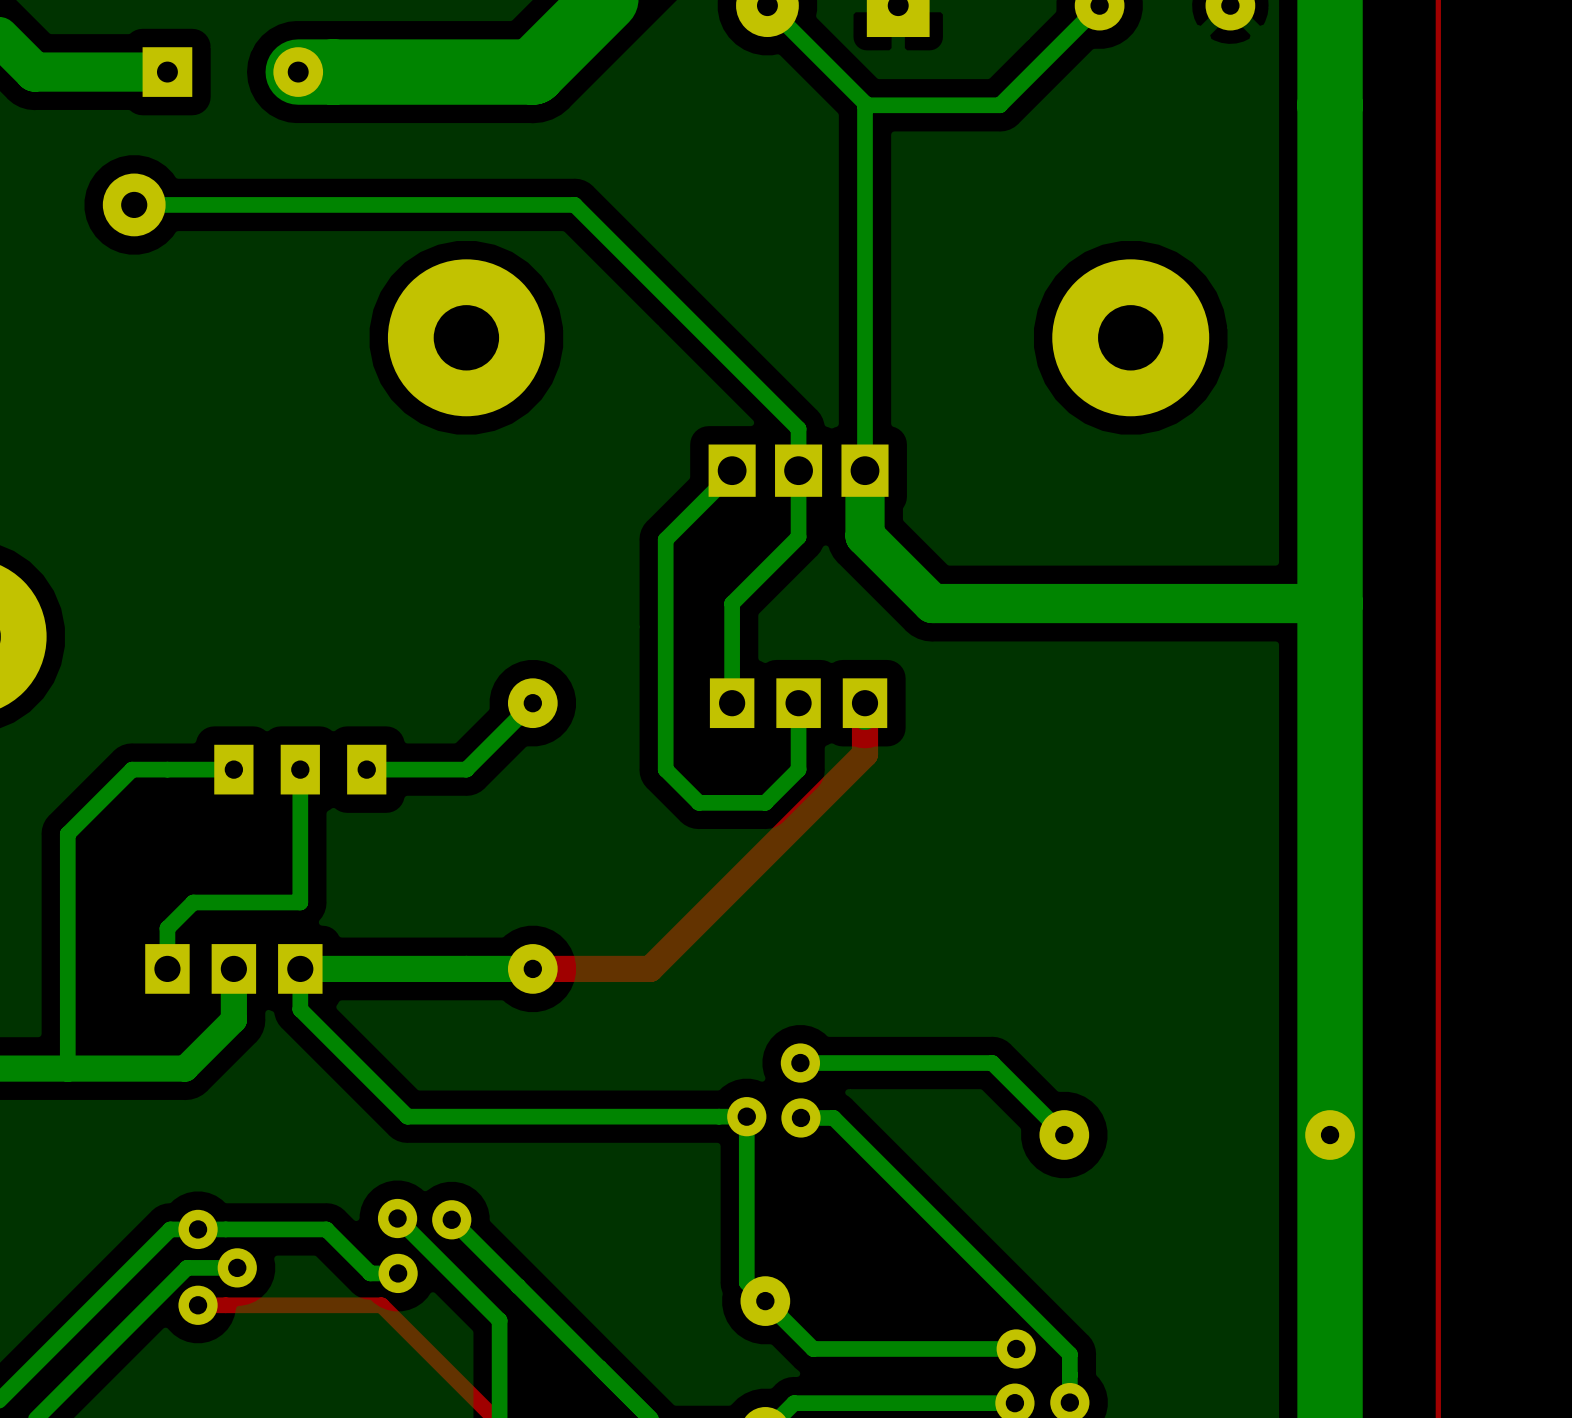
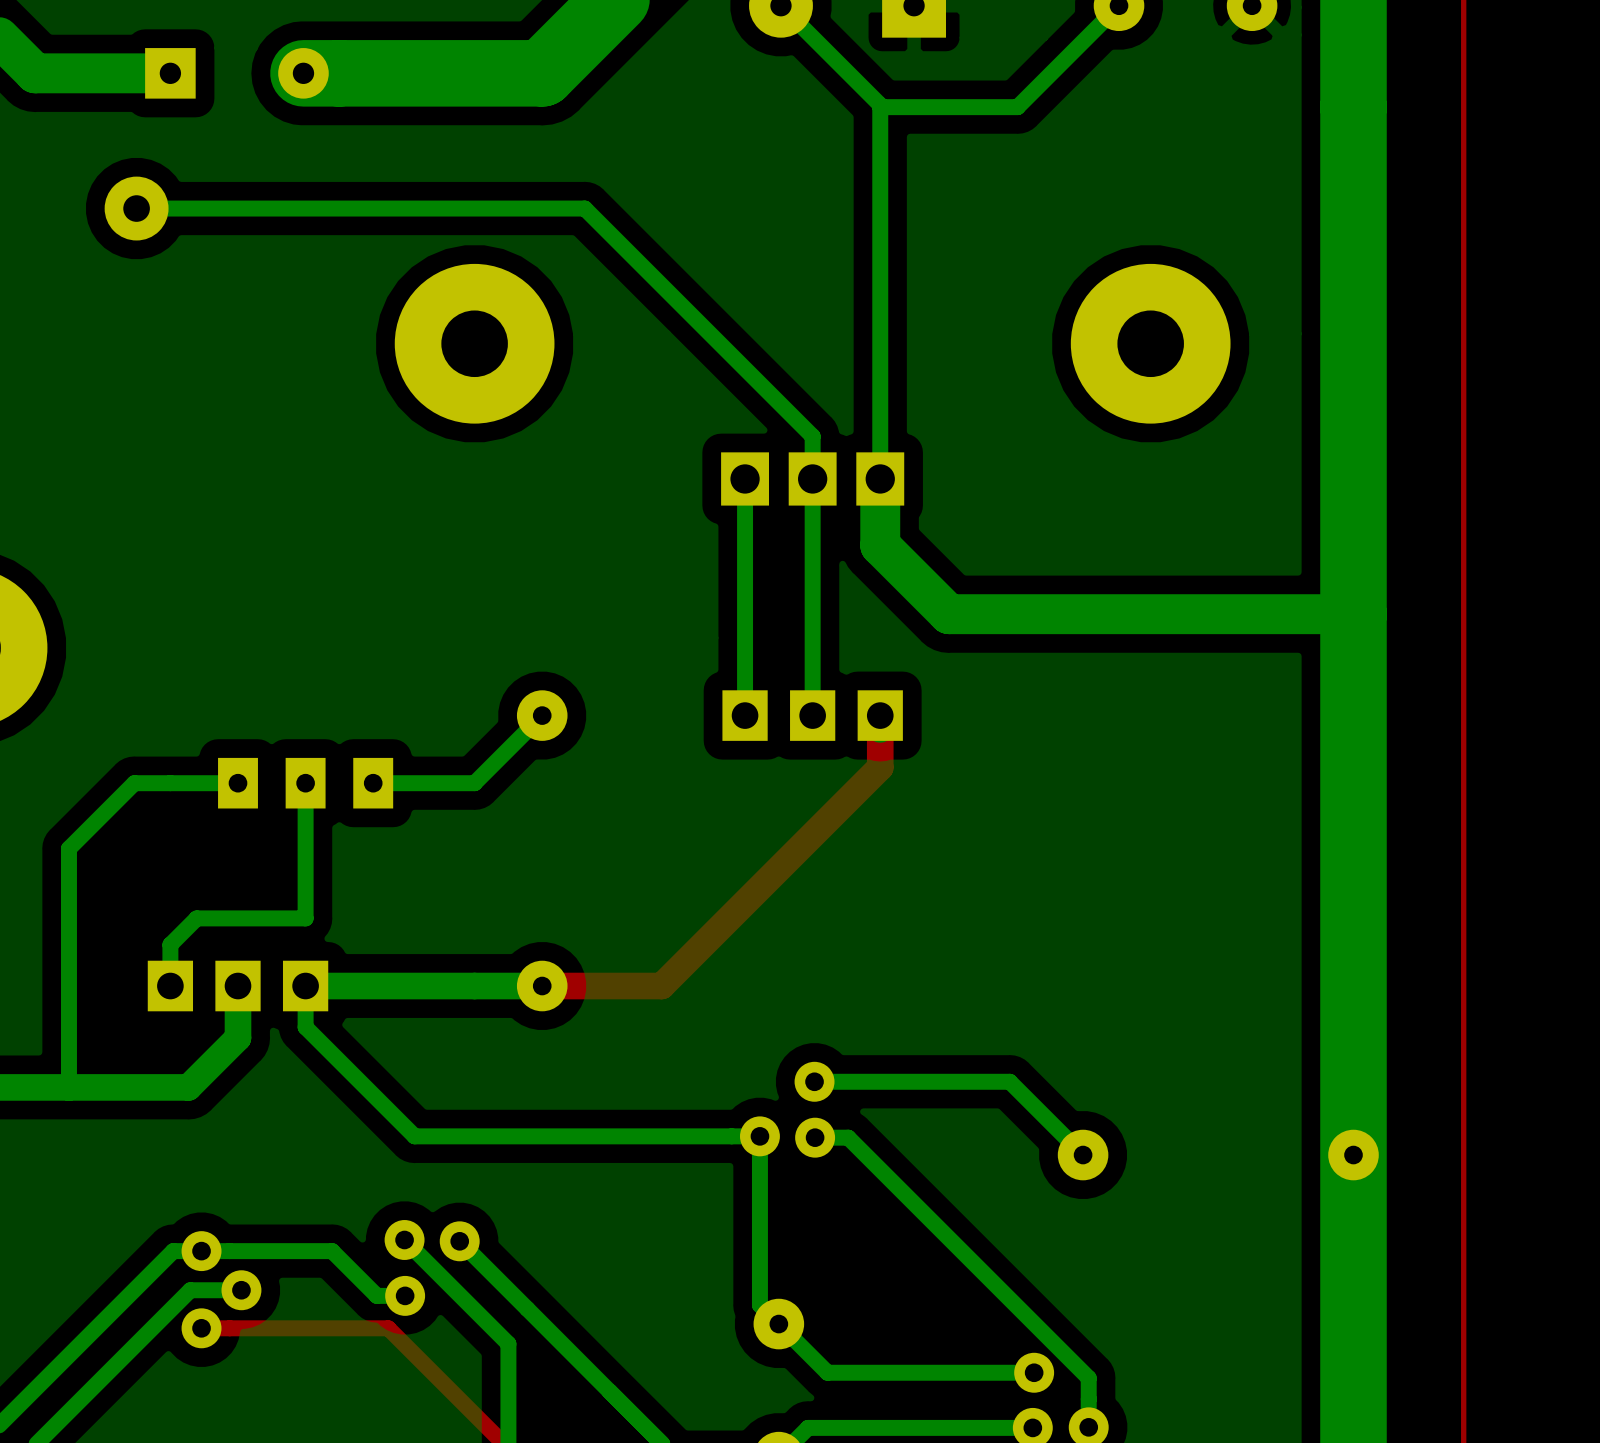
bottom track: (732, 473) (665, 539) (665, 769) (698, 802) (765, 802) (798, 769) (798, 703) -> (812, 546) (812, 715)
bottom track: (798, 537) (732, 603) -> (745, 481) (745, 614)

